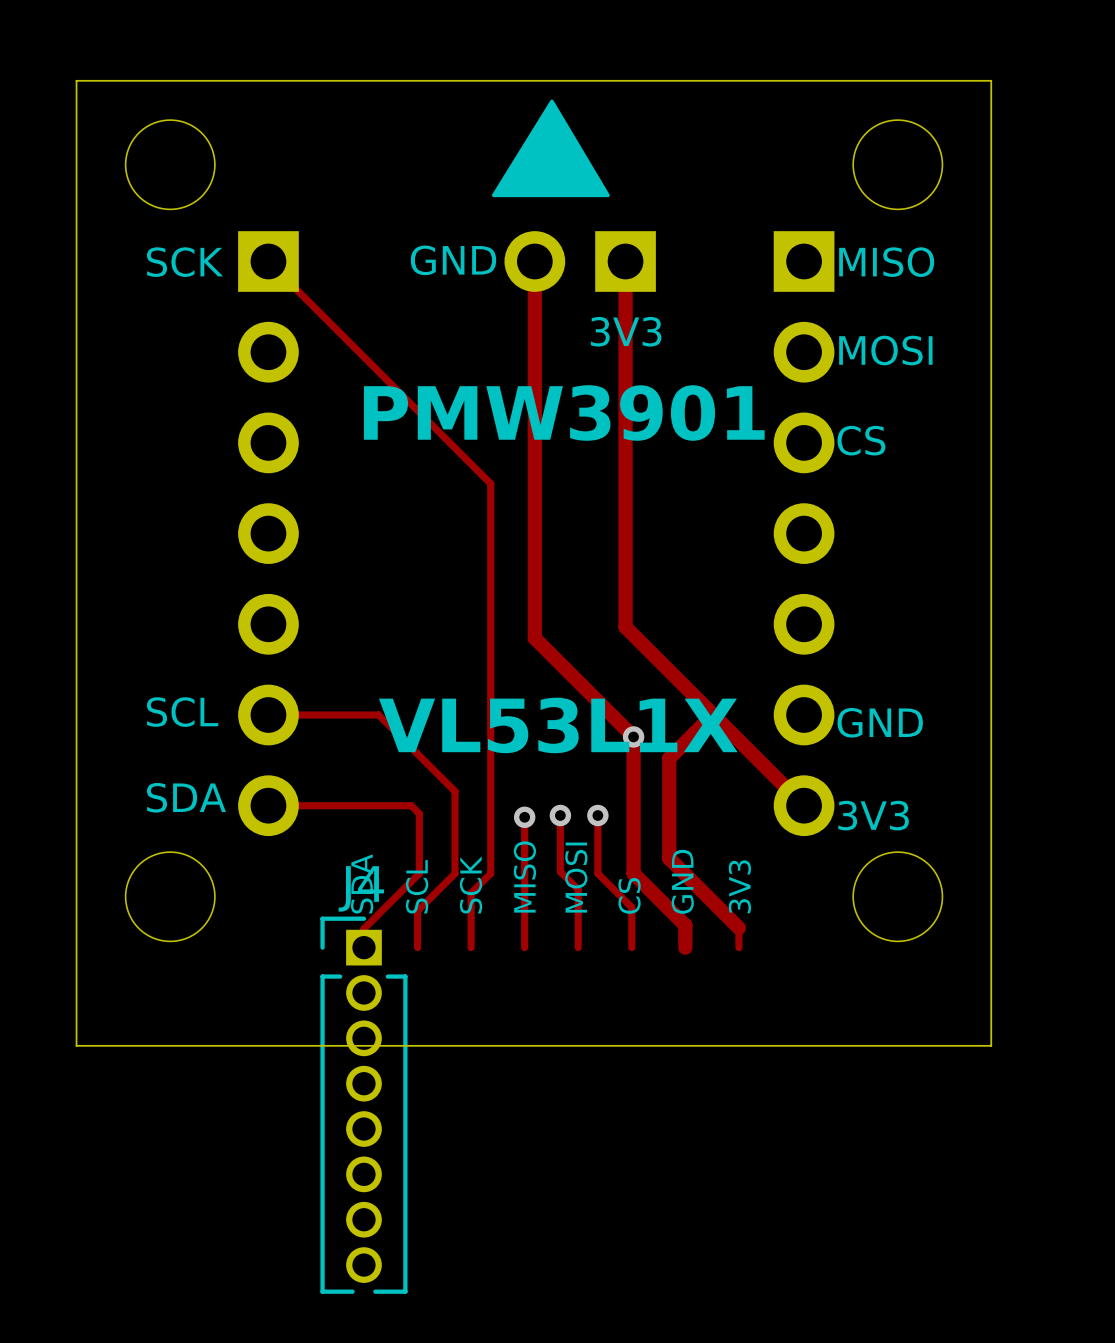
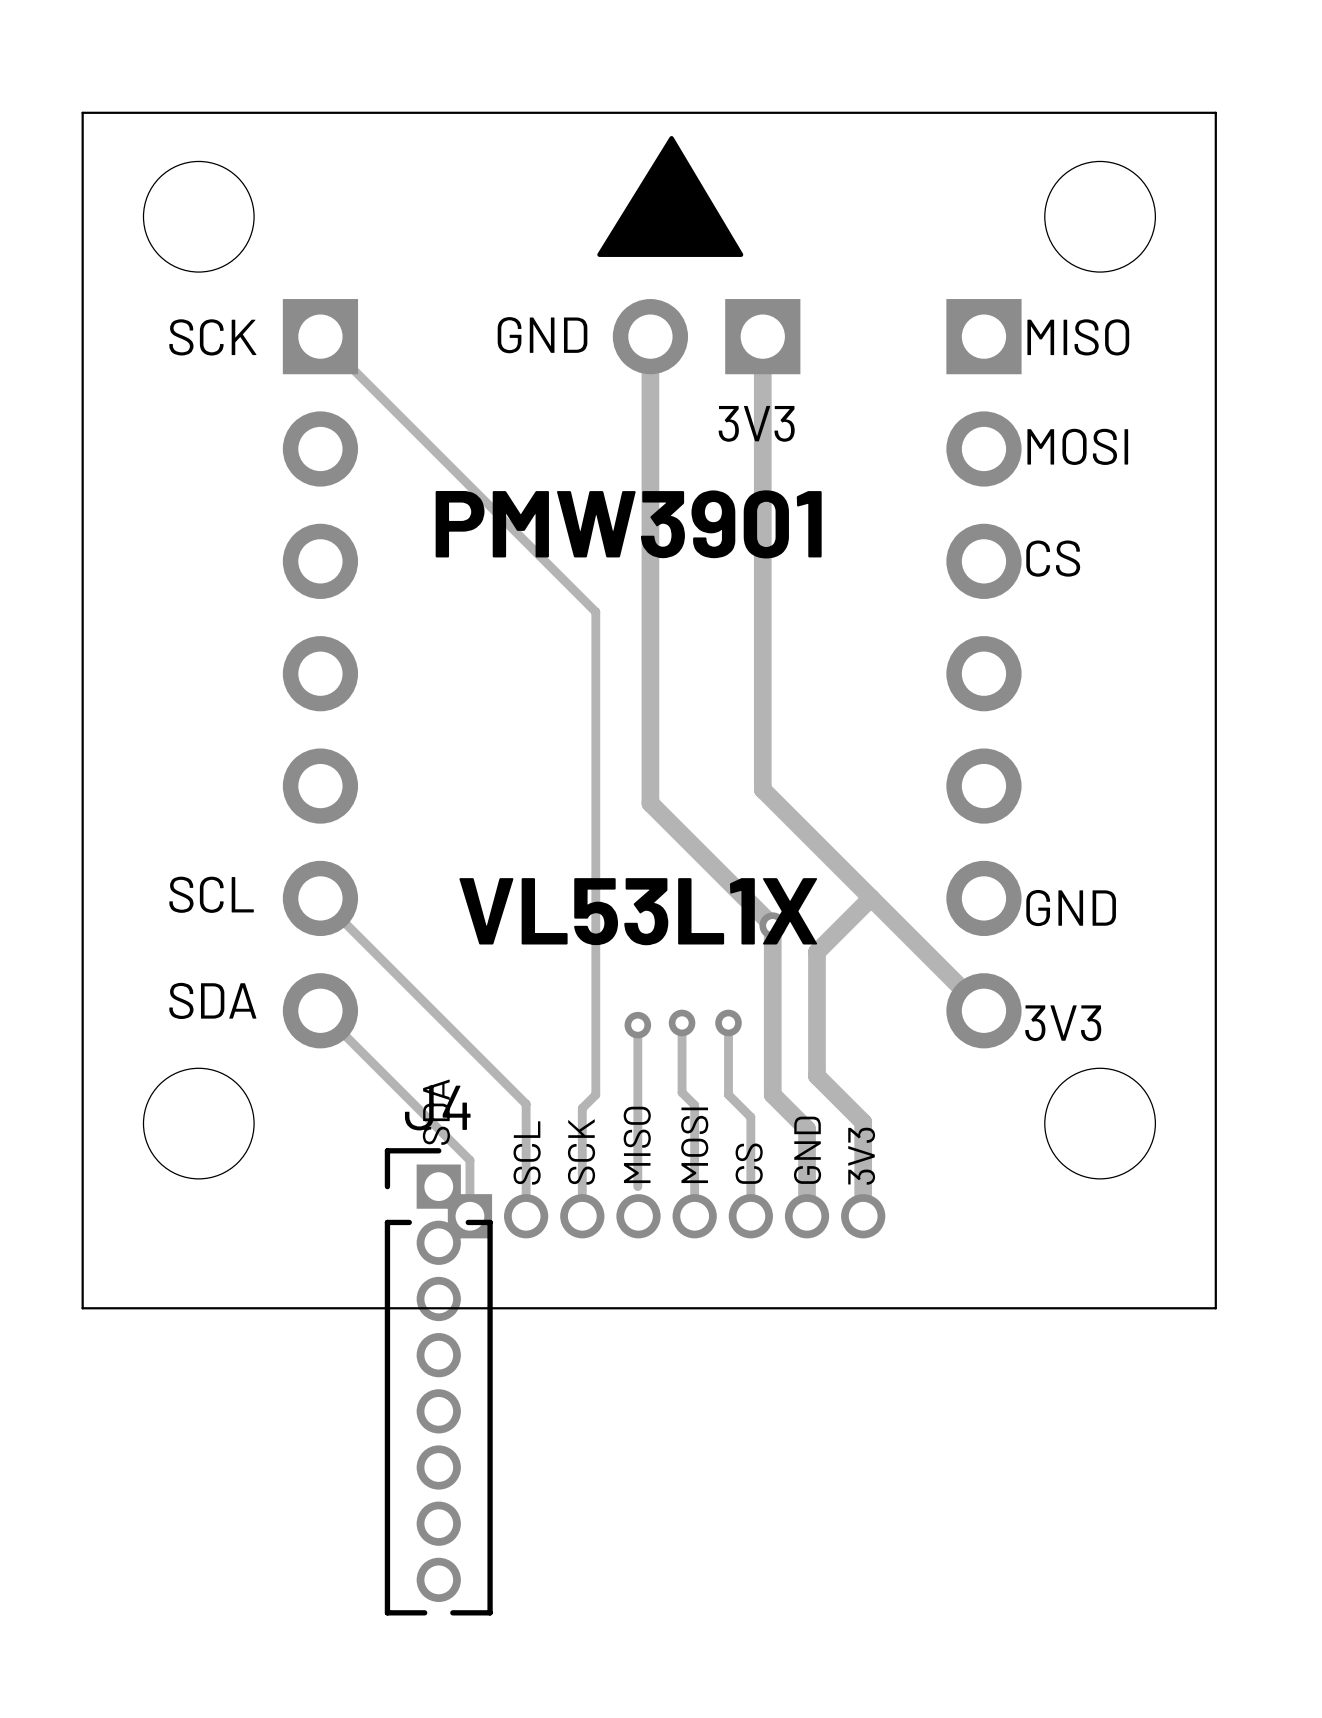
track: (268, 714) (378, 714) (455, 791) (455, 873) (417, 911) (417, 947) -> (320, 898) (526, 1104) (526, 1216)
track: (268, 805) (411, 805) (419, 813) (419, 873) (363, 928) (363, 947) -> (320, 1010) (469, 1160) (469, 1216)
text position: MISO (524, 876) -> MISO (637, 1144)
text position: MOSI (576, 877) -> MOSI (694, 1145)
track: (570, 881) (578, 889) (578, 947) -> (694, 1105) (694, 1216)
text position: GND (682, 881) -> GND (807, 1150)
text position: SCK (471, 884) -> SCK (581, 1151)
track: (479, 884) (471, 893) (471, 947) -> (582, 1108) (582, 1216)
text position: SCL (417, 886) -> SCL (527, 1152)
text position: 3V3 (739, 886) -> 3V3 (861, 1156)
track: (615, 891) (631, 907) (631, 947) -> (750, 1117) (750, 1216)
text position: CS (629, 895) -> CS (749, 1163)
track: (706, 895) (738, 927) (738, 947) -> (863, 1122) (863, 1216)
track: (661, 901) (685, 925) (685, 947) -> (807, 1129) (807, 1216)
part: none -> (666, 1216)

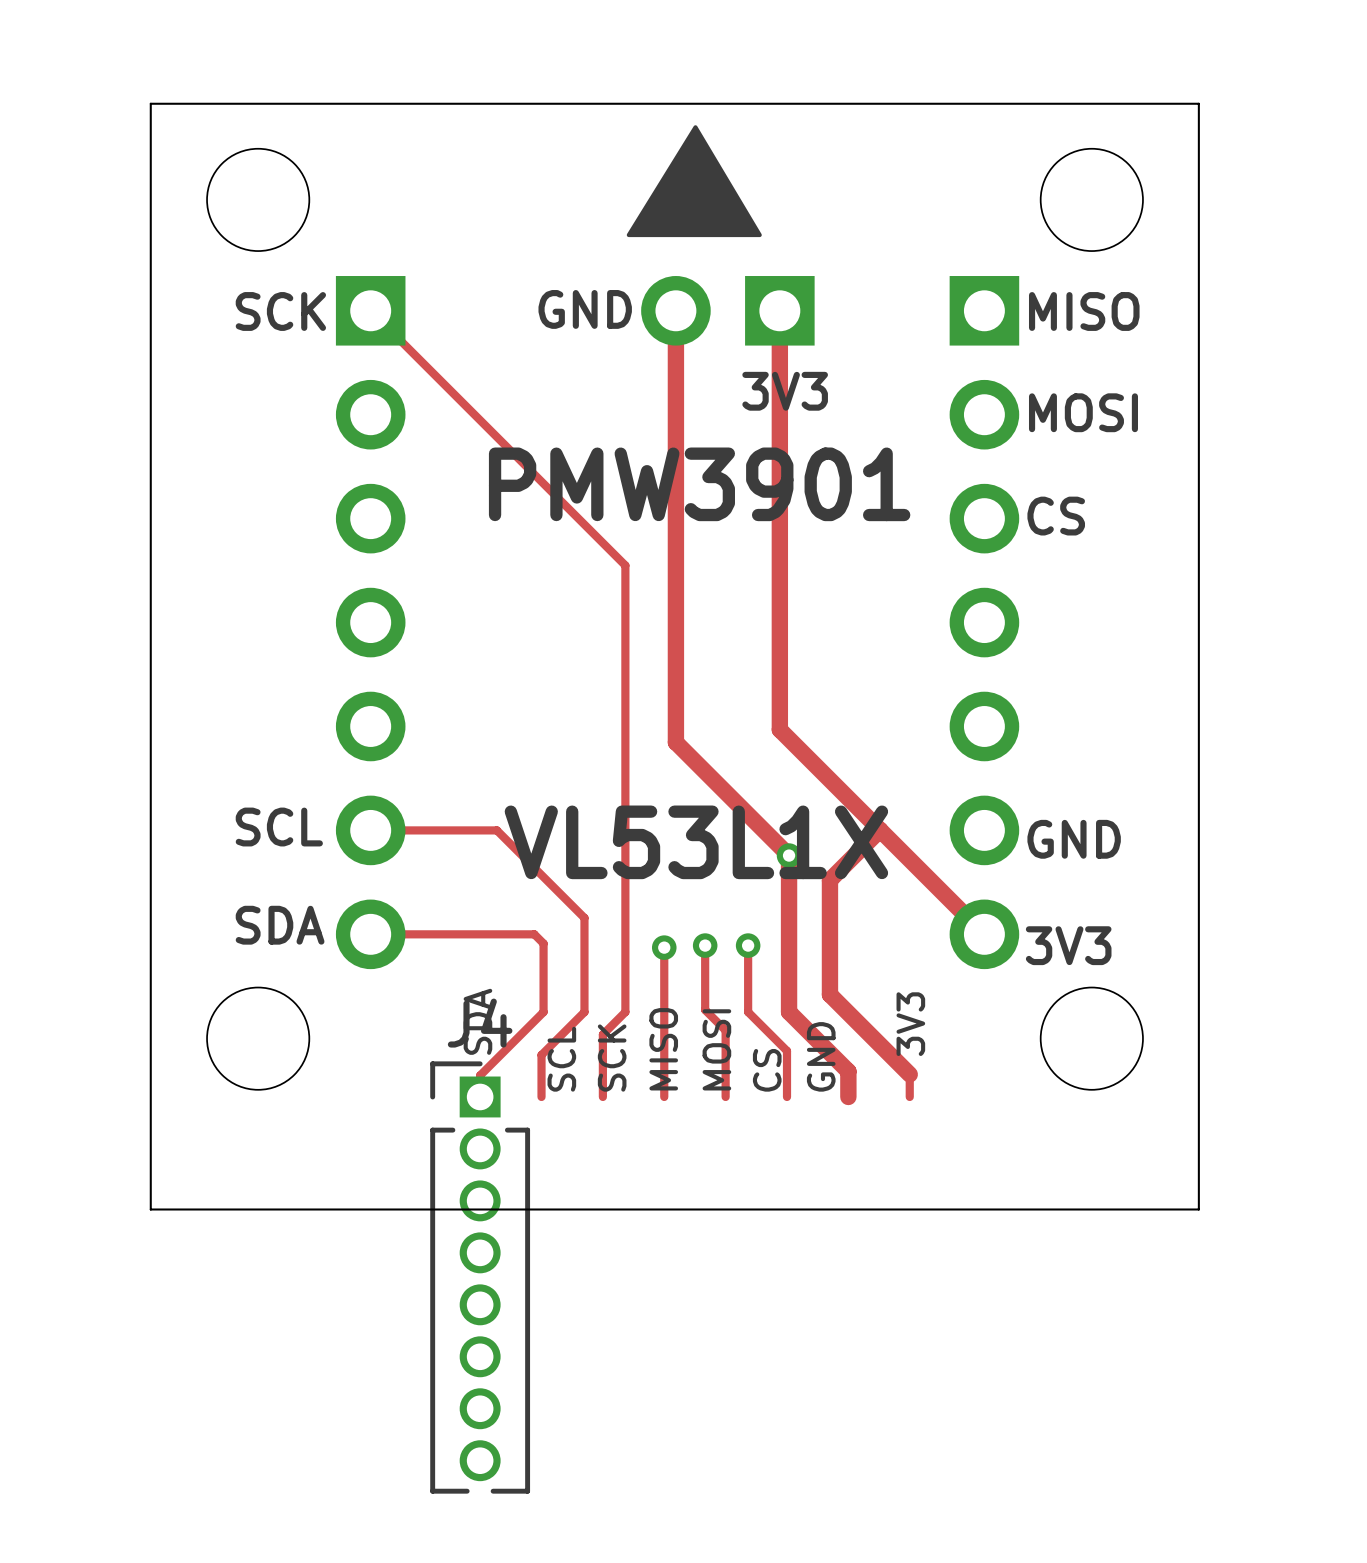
track: (320, 898) (526, 1104) (526, 1216) -> (370, 830) (496, 830) (584, 917) (584, 1012) (541, 1055) (541, 1096)
track: (320, 1010) (469, 1160) (469, 1216) -> (370, 934) (534, 934) (543, 943) (543, 1012) (480, 1075) (480, 1096)
track: (694, 1105) (694, 1216) -> (716, 1021) (725, 1030) (725, 1096)
track: (582, 1108) (582, 1216) -> (612, 1024) (602, 1034) (602, 1096)
track: (750, 1117) (750, 1216) -> (768, 1032) (787, 1050) (787, 1096)
track: (863, 1122) (863, 1216) -> (872, 1037) (909, 1074) (909, 1096)
track: (807, 1129) (807, 1216) -> (820, 1043) (848, 1071) (848, 1096)
text position: 3V3 (861, 1156) -> 3V3 (910, 1024)
part: (666, 1216) -> none

